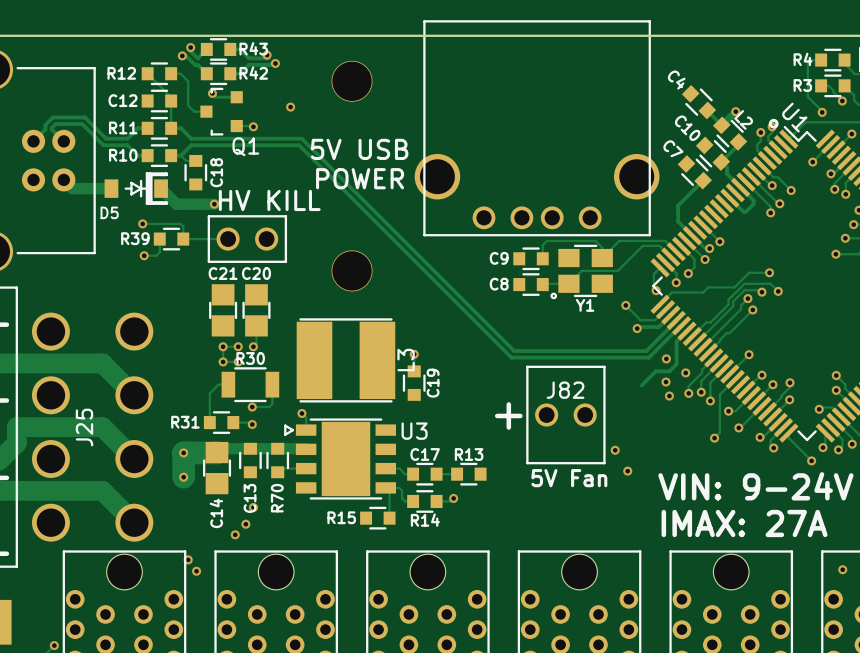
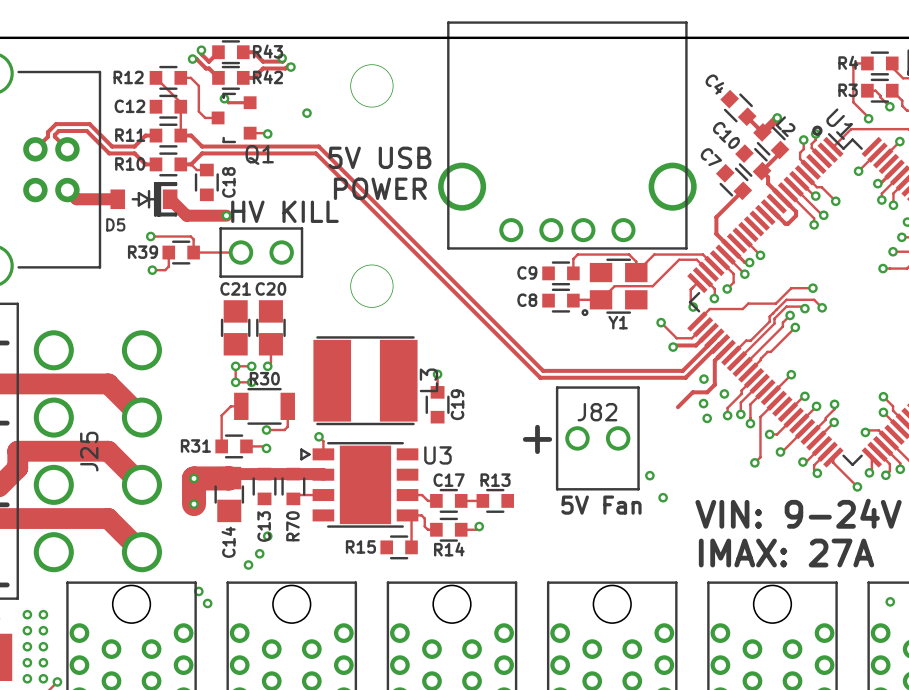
via: none -> (27, 614)
via: none -> (43, 614)
via: none -> (27, 630)
via: none -> (43, 630)
via: none -> (27, 646)
via: none -> (43, 646)
via: none -> (27, 662)
via: none -> (43, 662)
via: none -> (27, 678)
via: none -> (43, 678)

